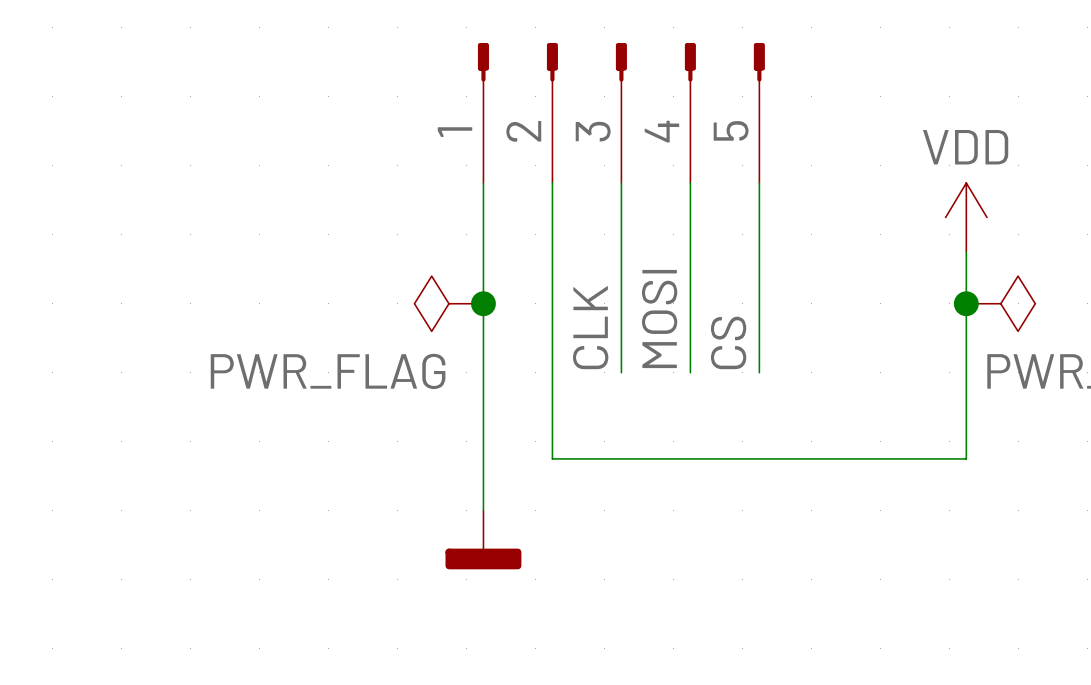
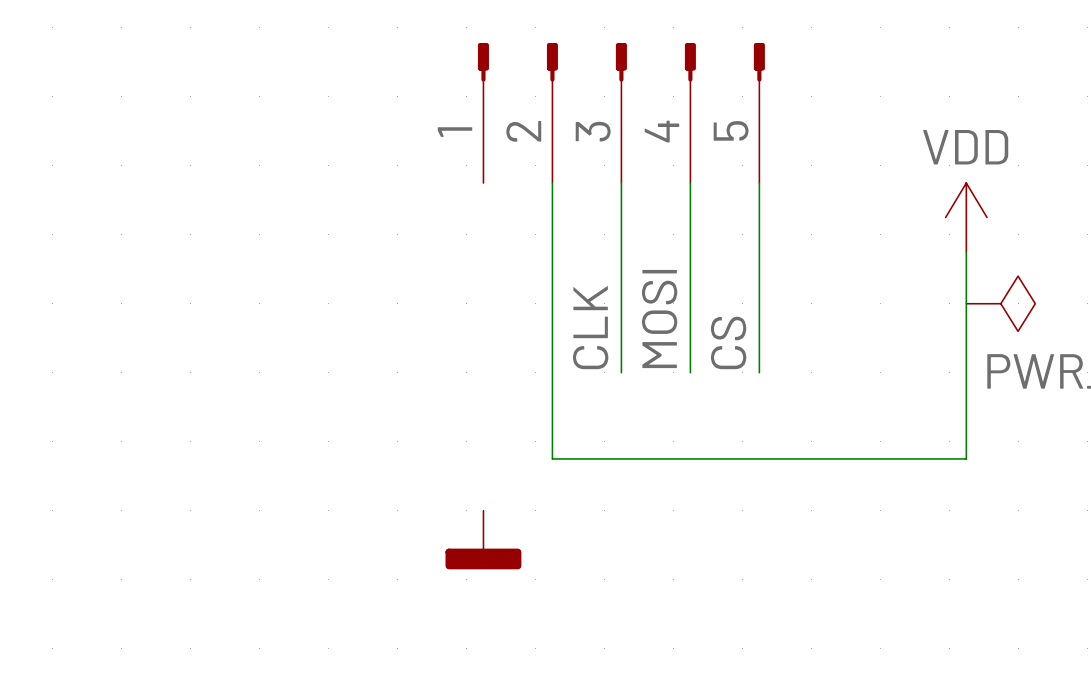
wire: (483, 183) (483, 510) -> none
power symbol: PWR_FLAG (448, 303) -> none
junction: (483, 303) -> none
junction: (966, 303) -> none

